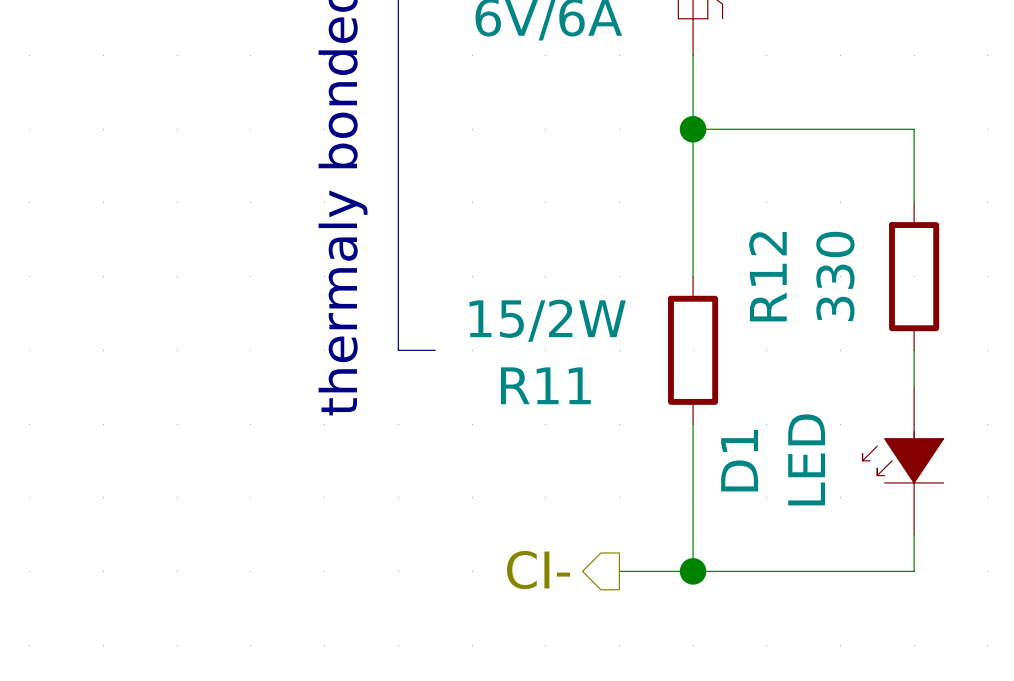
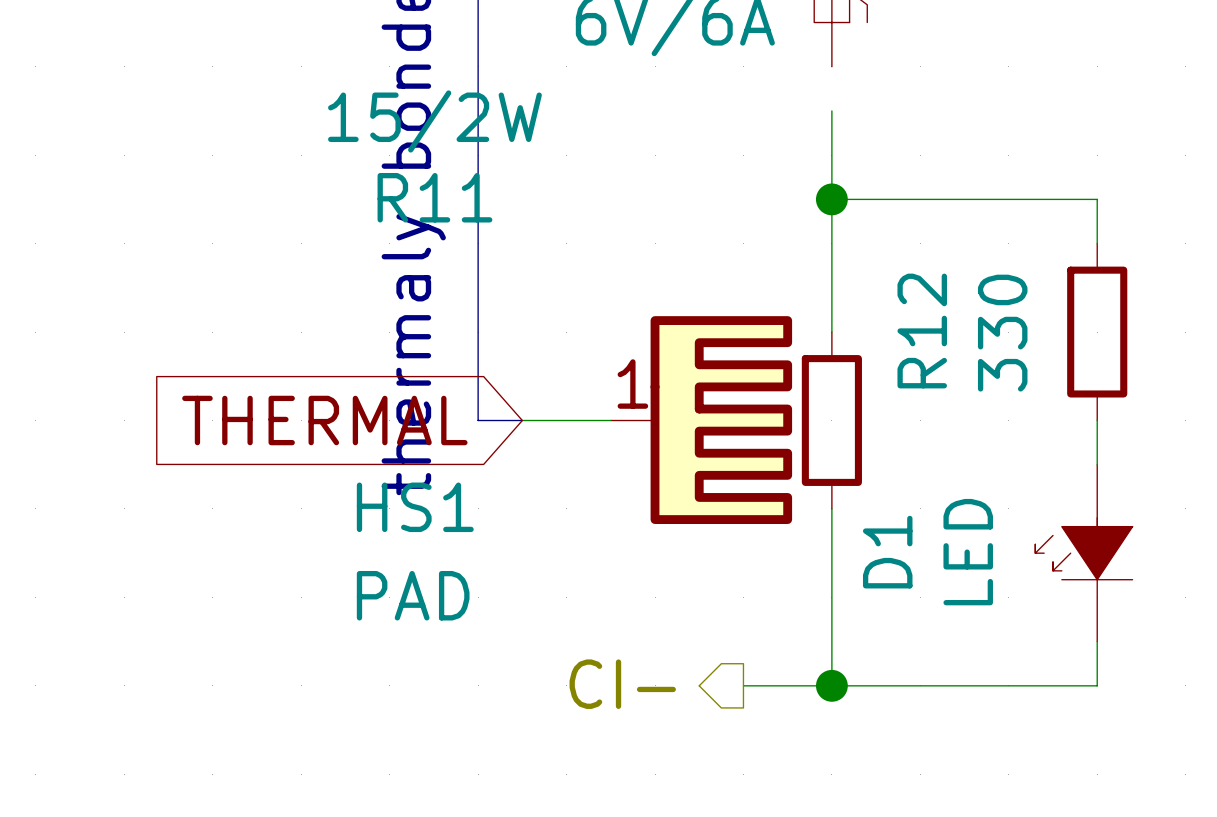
wire: (693, 55) (693, 92) -> none
wire: (693, 129) (914, 129) (914, 166) -> (831, 199) (1097, 199)
junction position: (693, 129) -> (831, 199)
R11 value position: 15/2W (547, 320) -> 15/2W (434, 121)
HS1: none -> PAD (701, 420)
global label: none -> THERMAL (324, 420)
wire: none -> (522, 420) (610, 420)
R11 name position: R11 (545, 385) -> R11 (434, 197)

